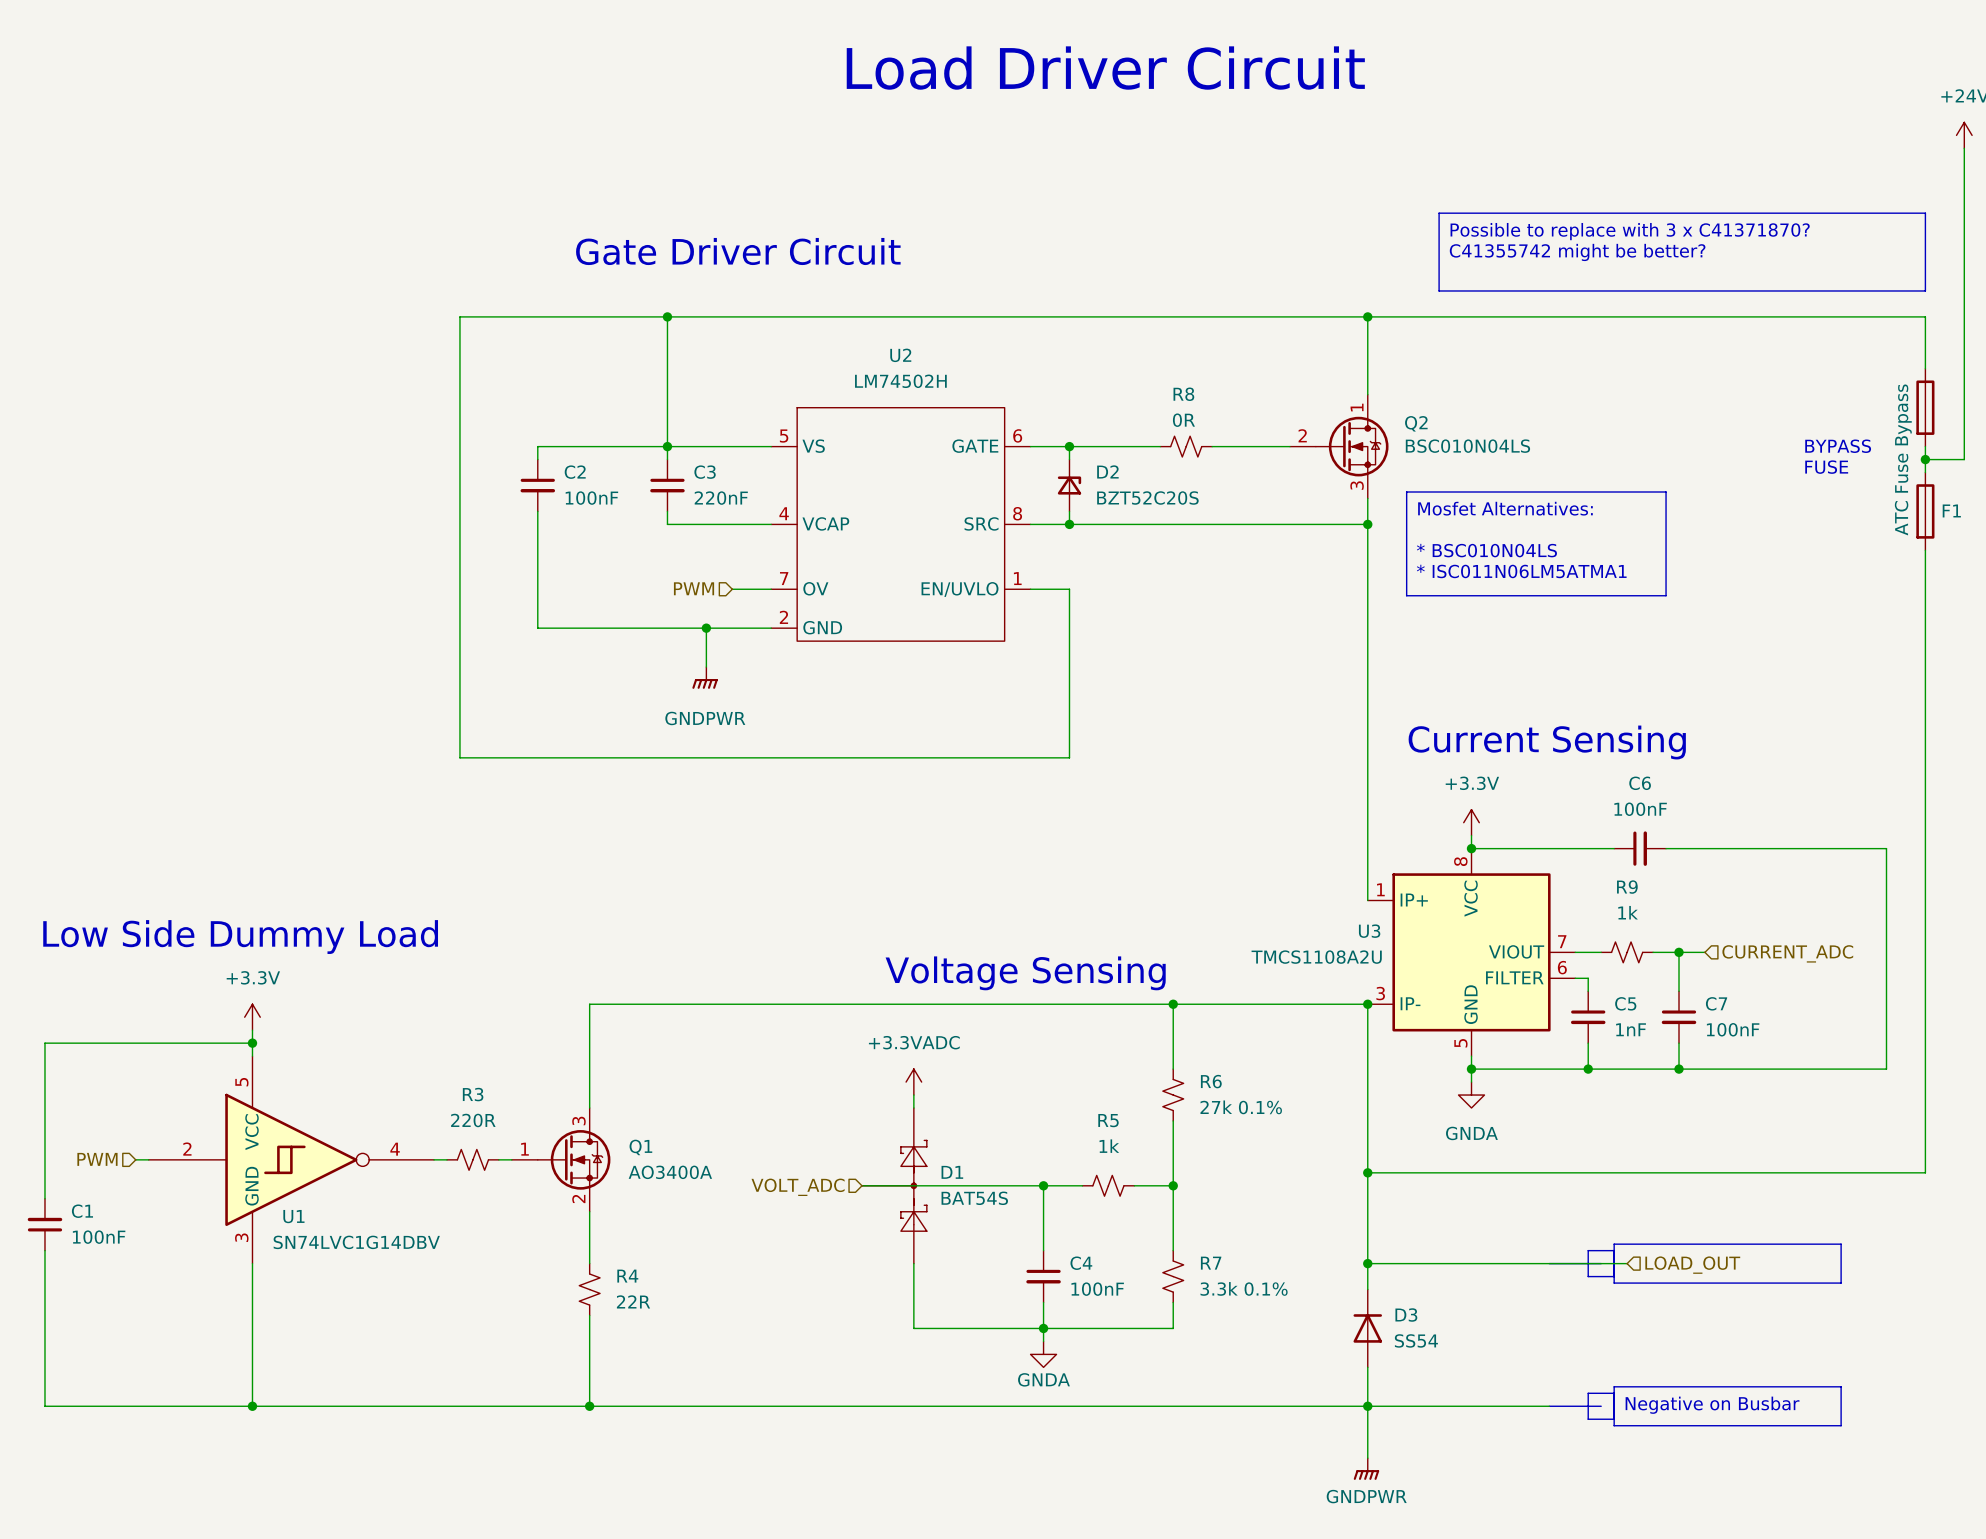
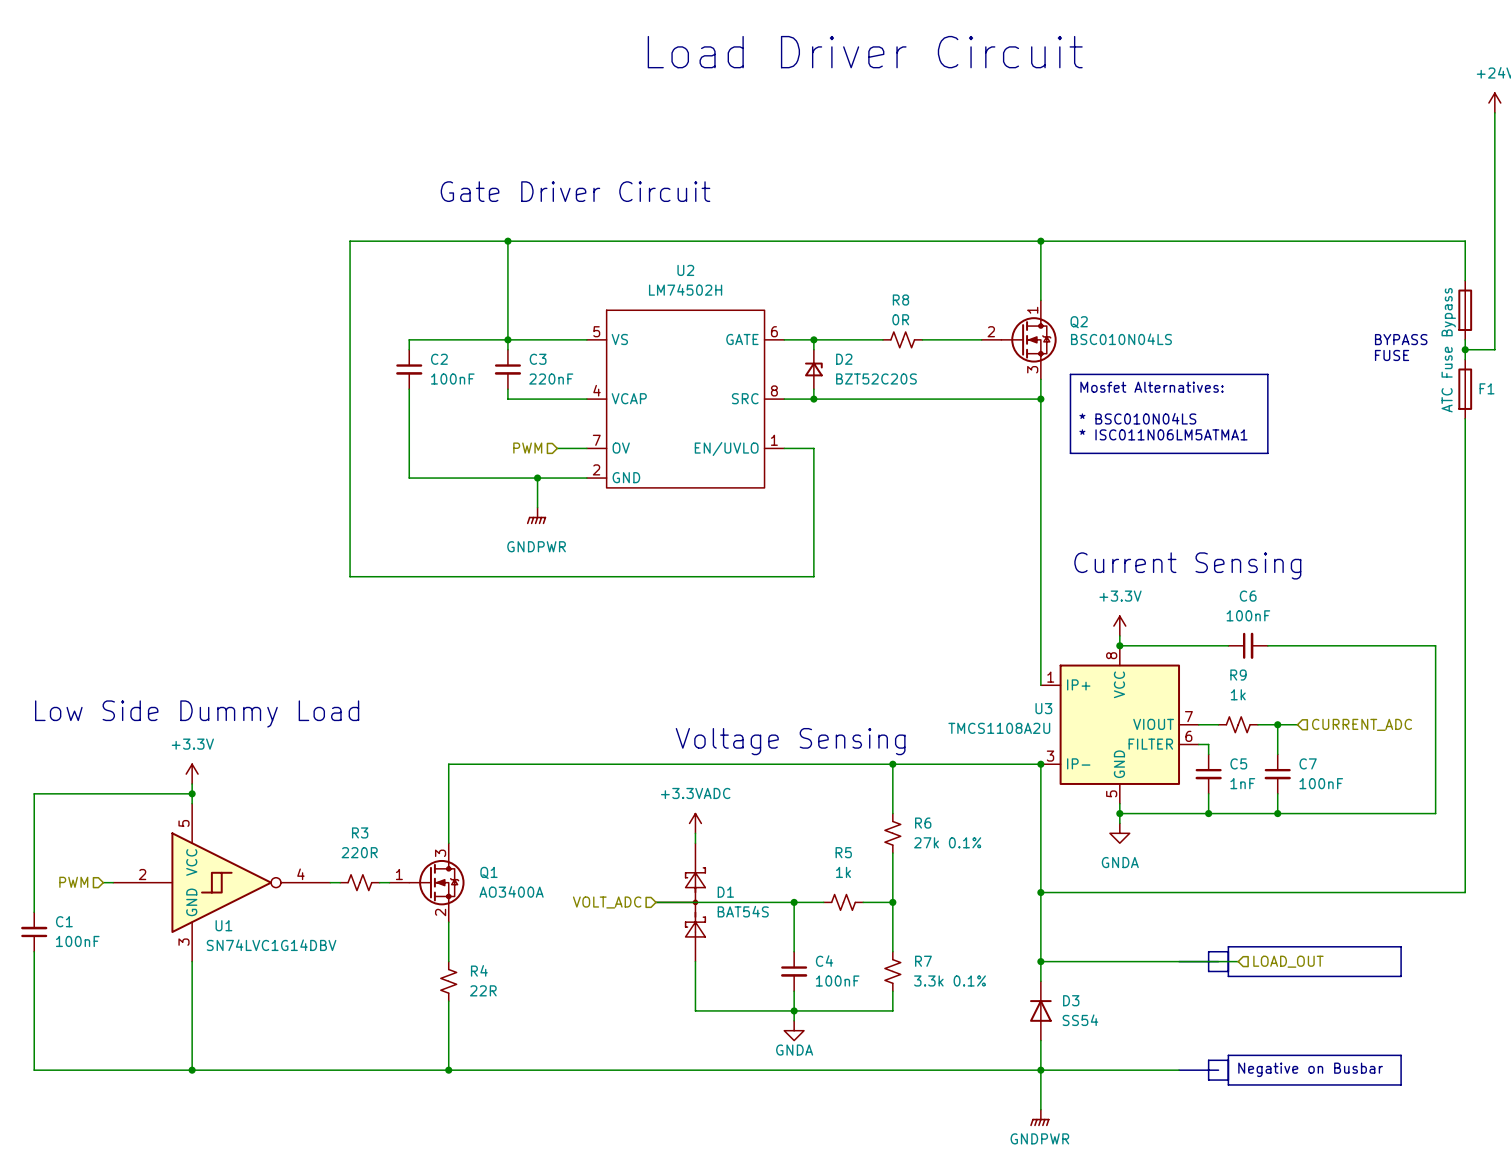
line: (1439, 213) (1925, 213) (1925, 290) (1439, 290) (1439, 213) -> none
text: Possible to replace with 3 x C41371870? (1630, 231) -> none
text: C41355742 might be better? (1577, 252) -> none

